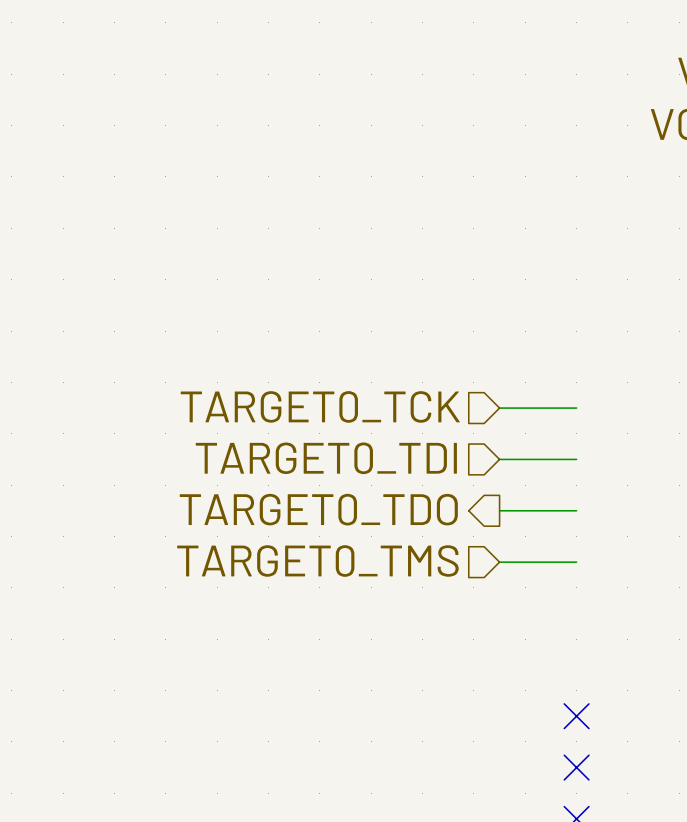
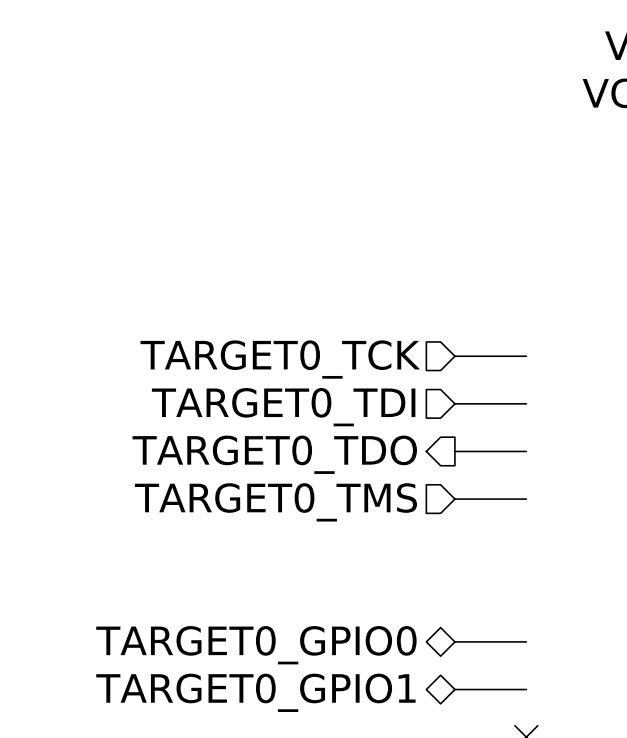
hierarchical label: none -> TARGET0_GPIO0 (256, 645)
wire: none -> (454, 641) (526, 641)
no-connect mark: (576, 716) -> none
hierarchical label: none -> TARGET0_GPIO1 (255, 692)
wire: none -> (454, 689) (526, 689)
no-connect mark: (576, 767) -> none

